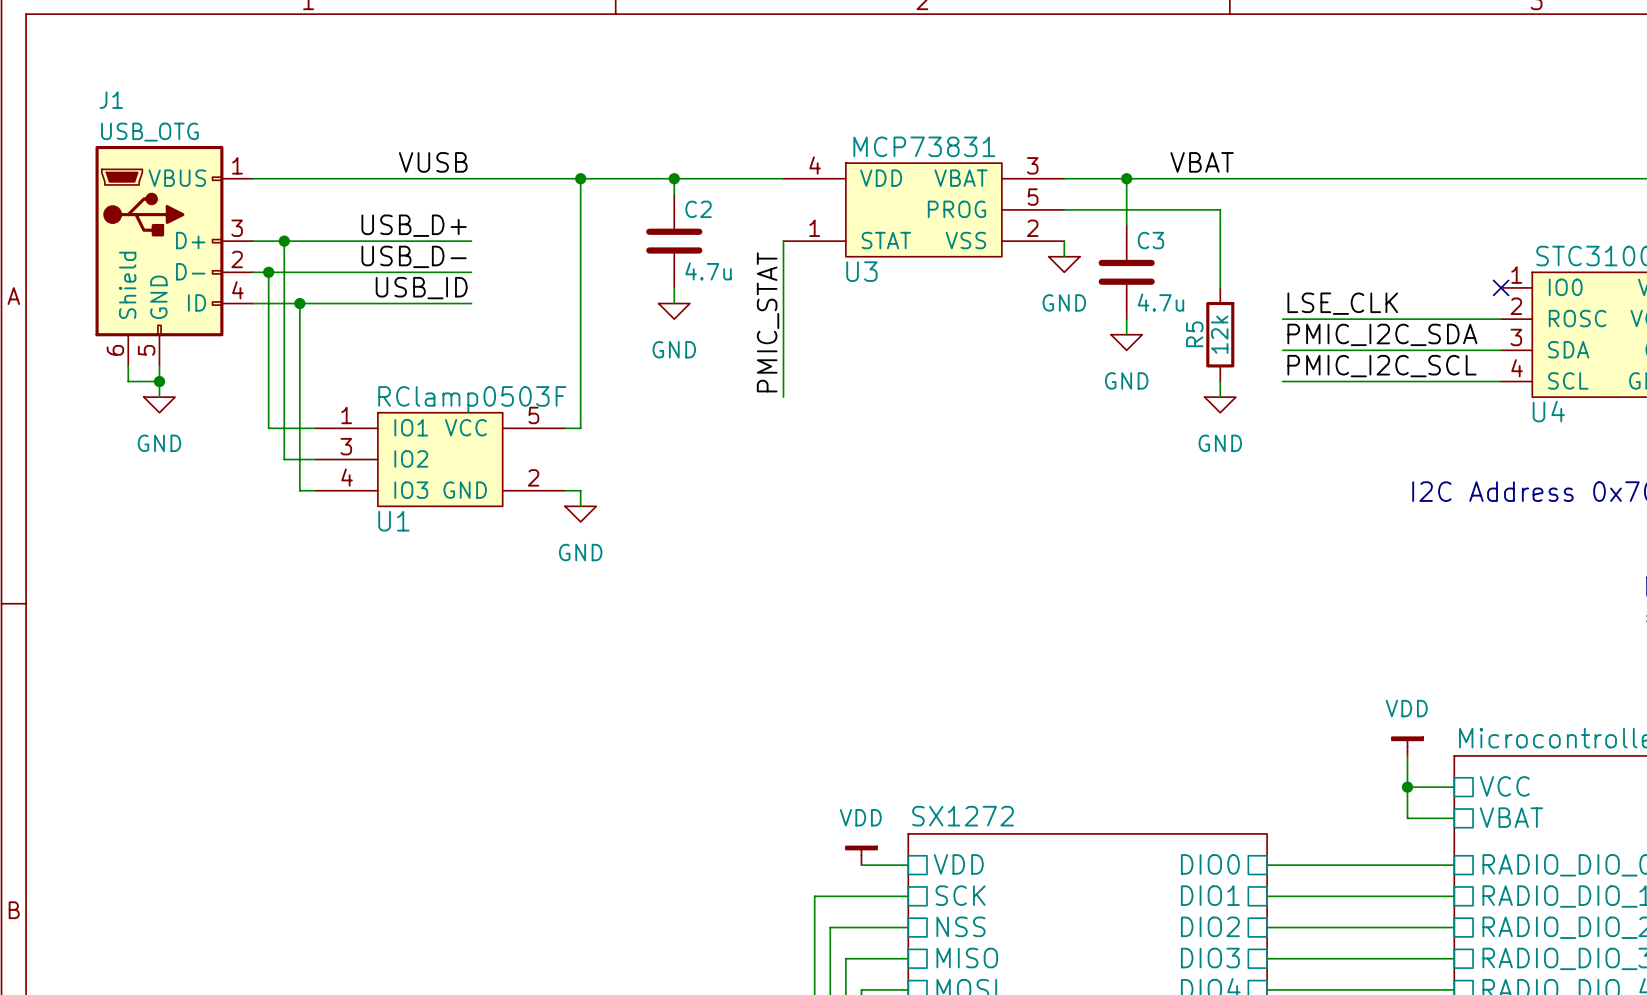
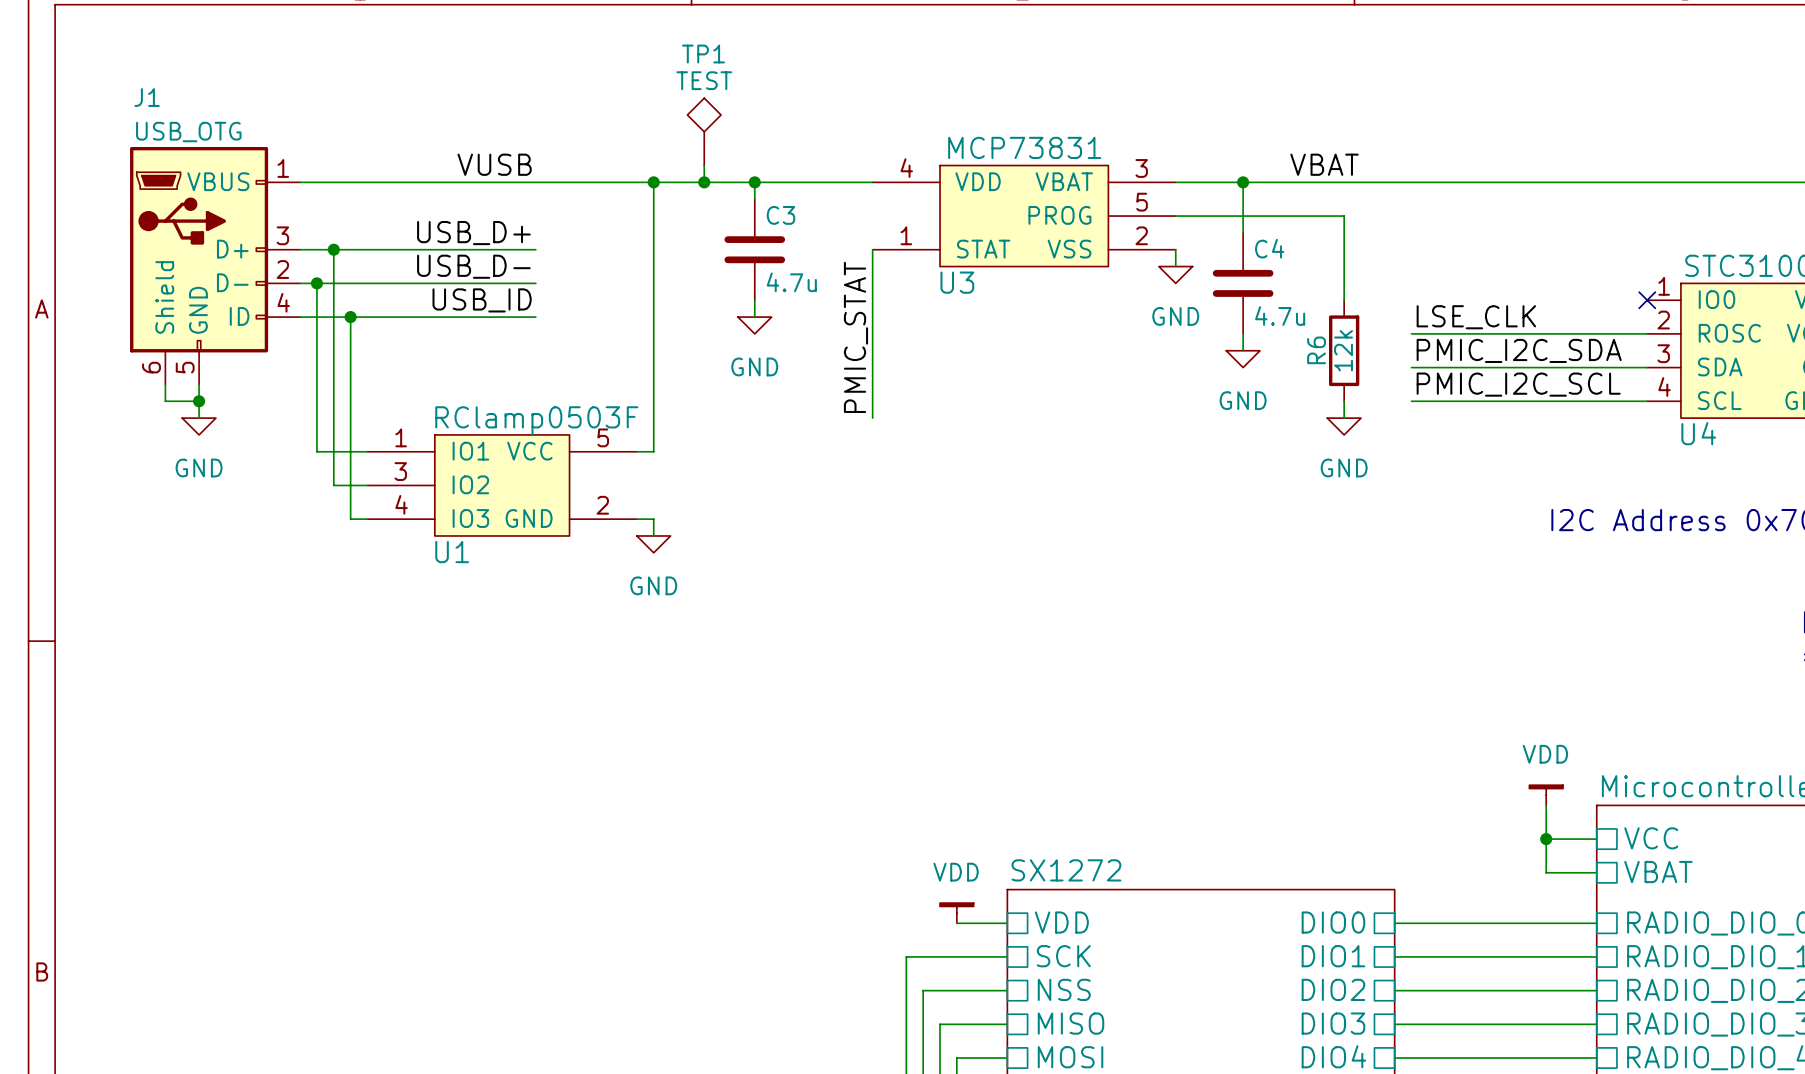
TP1: none -> TEST (704, 131)
wire: none -> (704, 165) (704, 182)
junction: none -> (704, 182)
C2 name: C2 (698, 209) -> C3 (780, 215)
C3 name: C3 (1150, 240) -> C4 (1269, 248)
R5 name: R5 (1194, 334) -> R6 (1316, 350)

